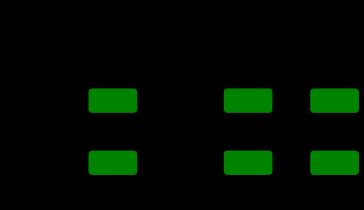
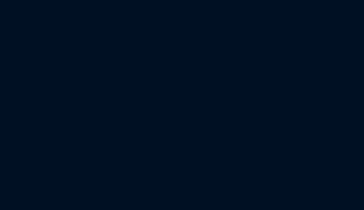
part: (112, 100) -> none
part: (248, 100) -> none
part: (334, 100) -> none
part: (112, 162) -> none
part: (248, 162) -> none
part: (334, 162) -> none

